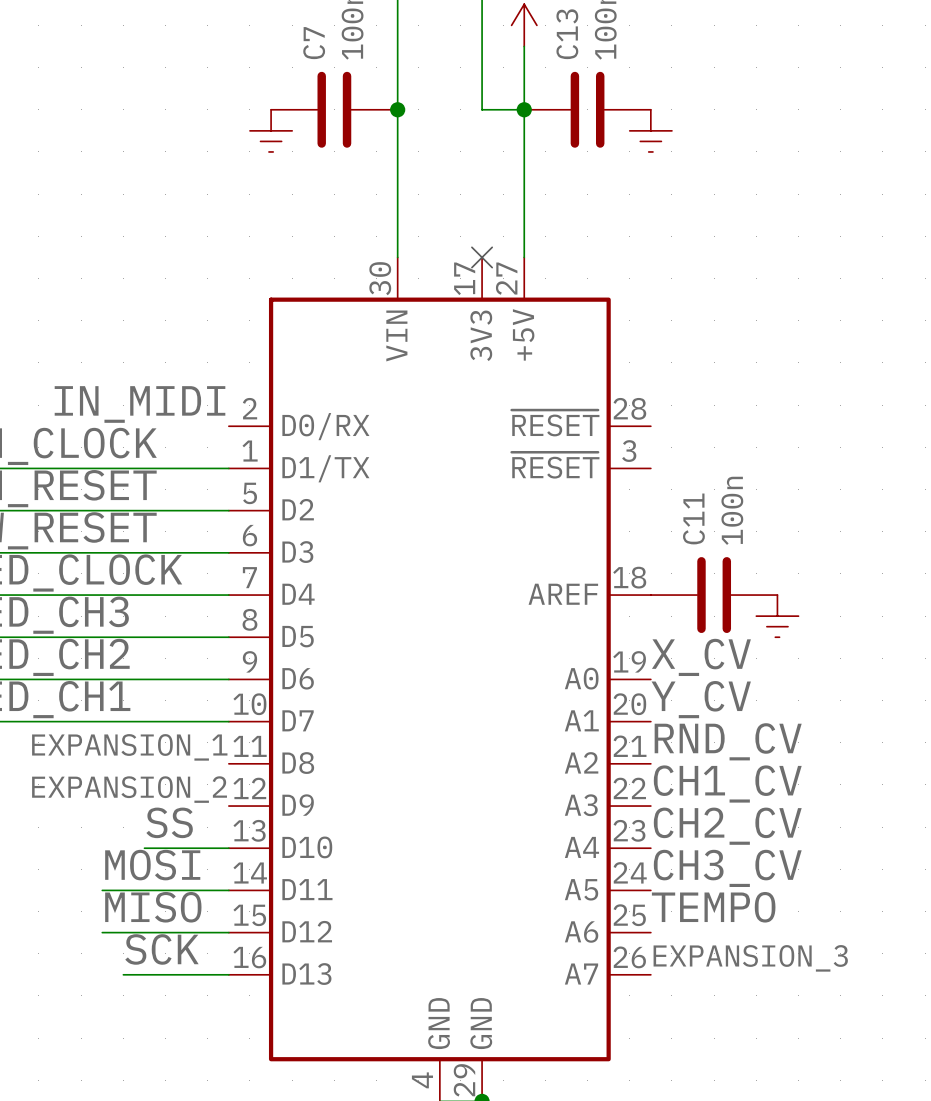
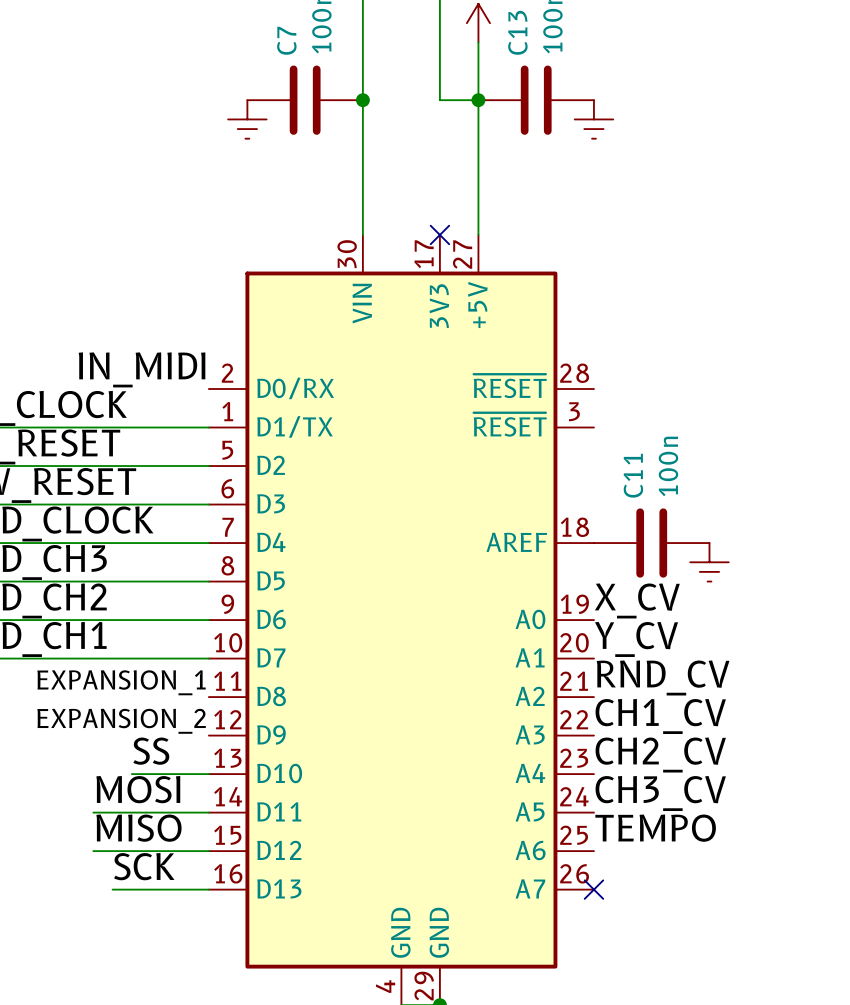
label: EXPANSION_3 (750, 958) -> none
no-connect mark: none -> (593, 889)

